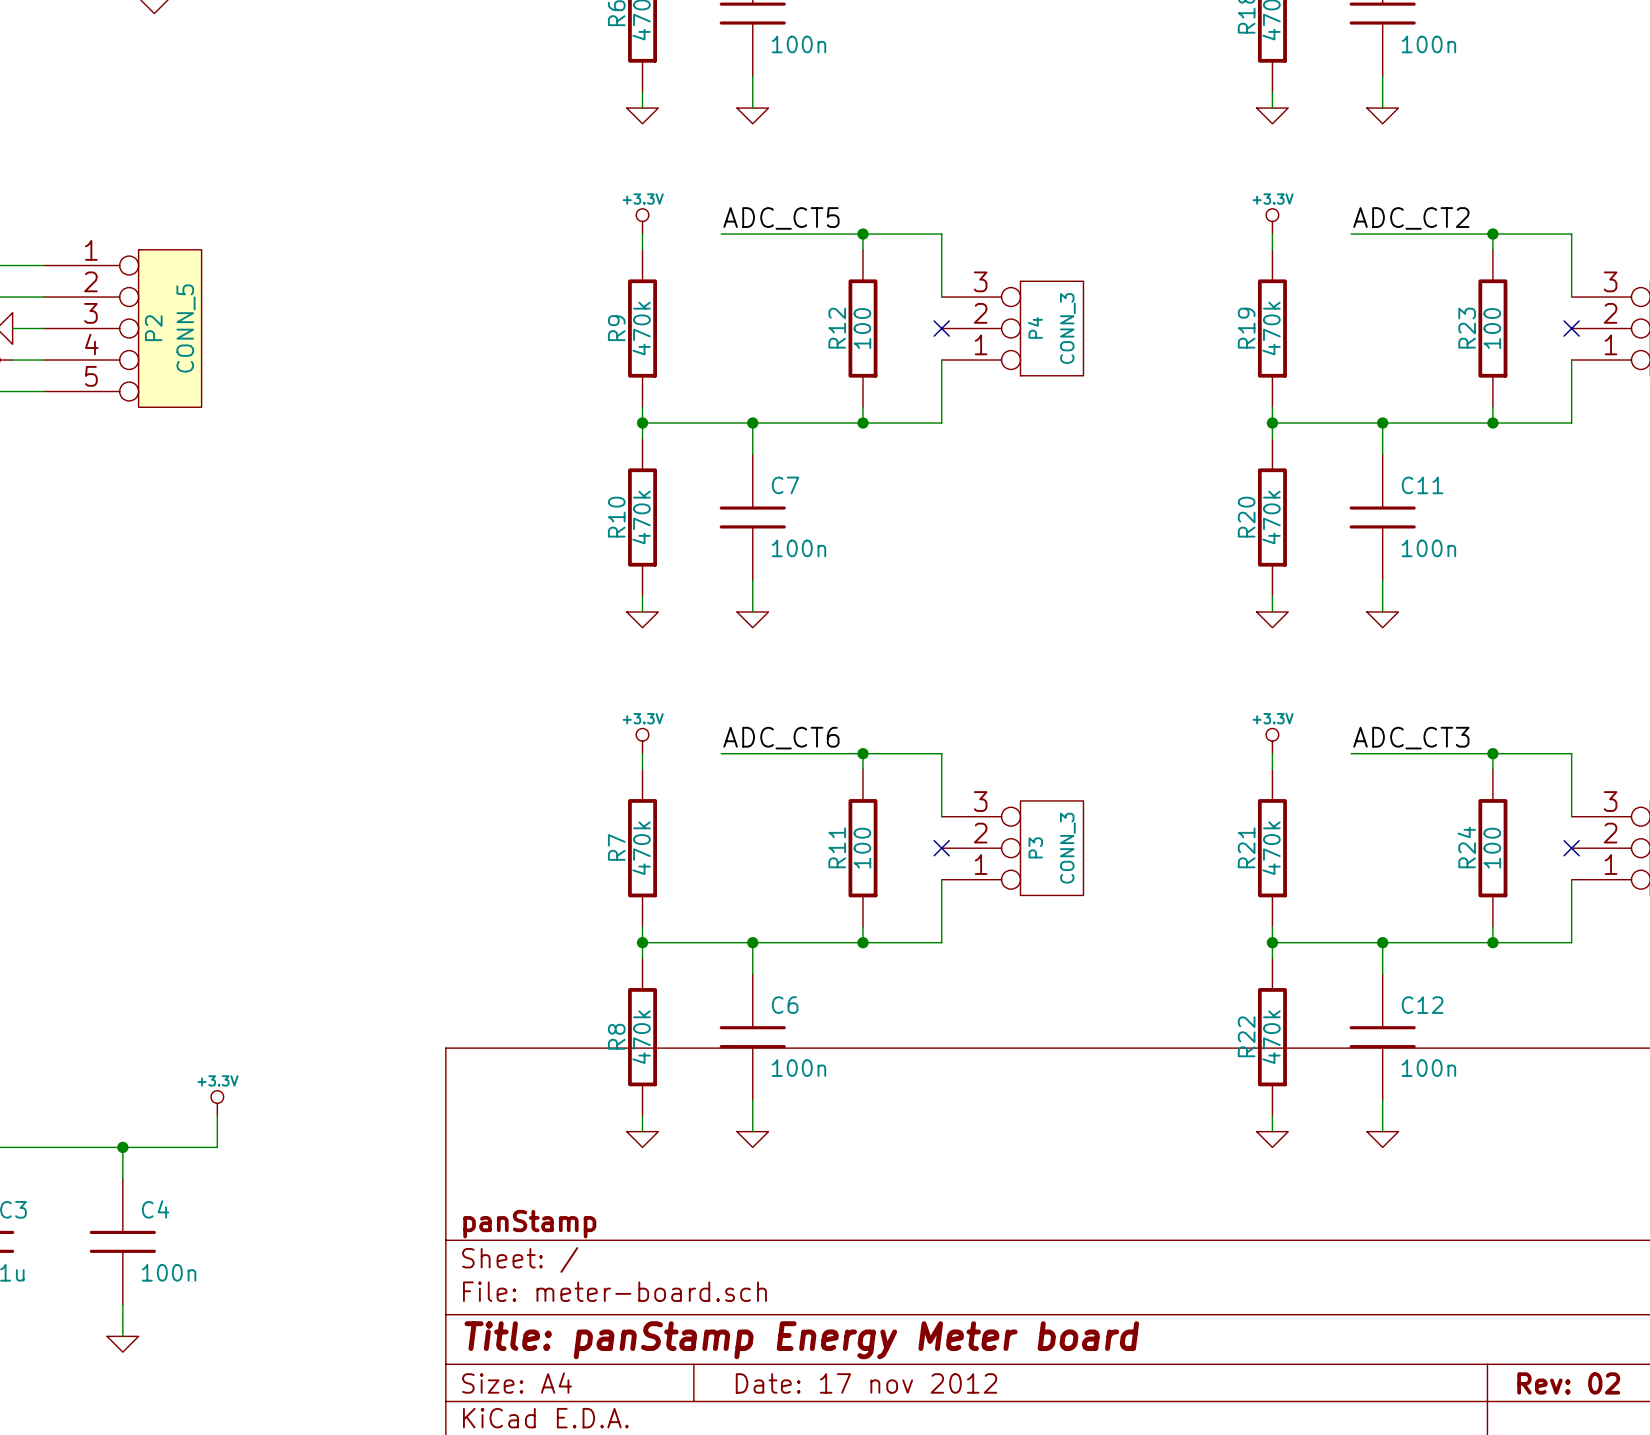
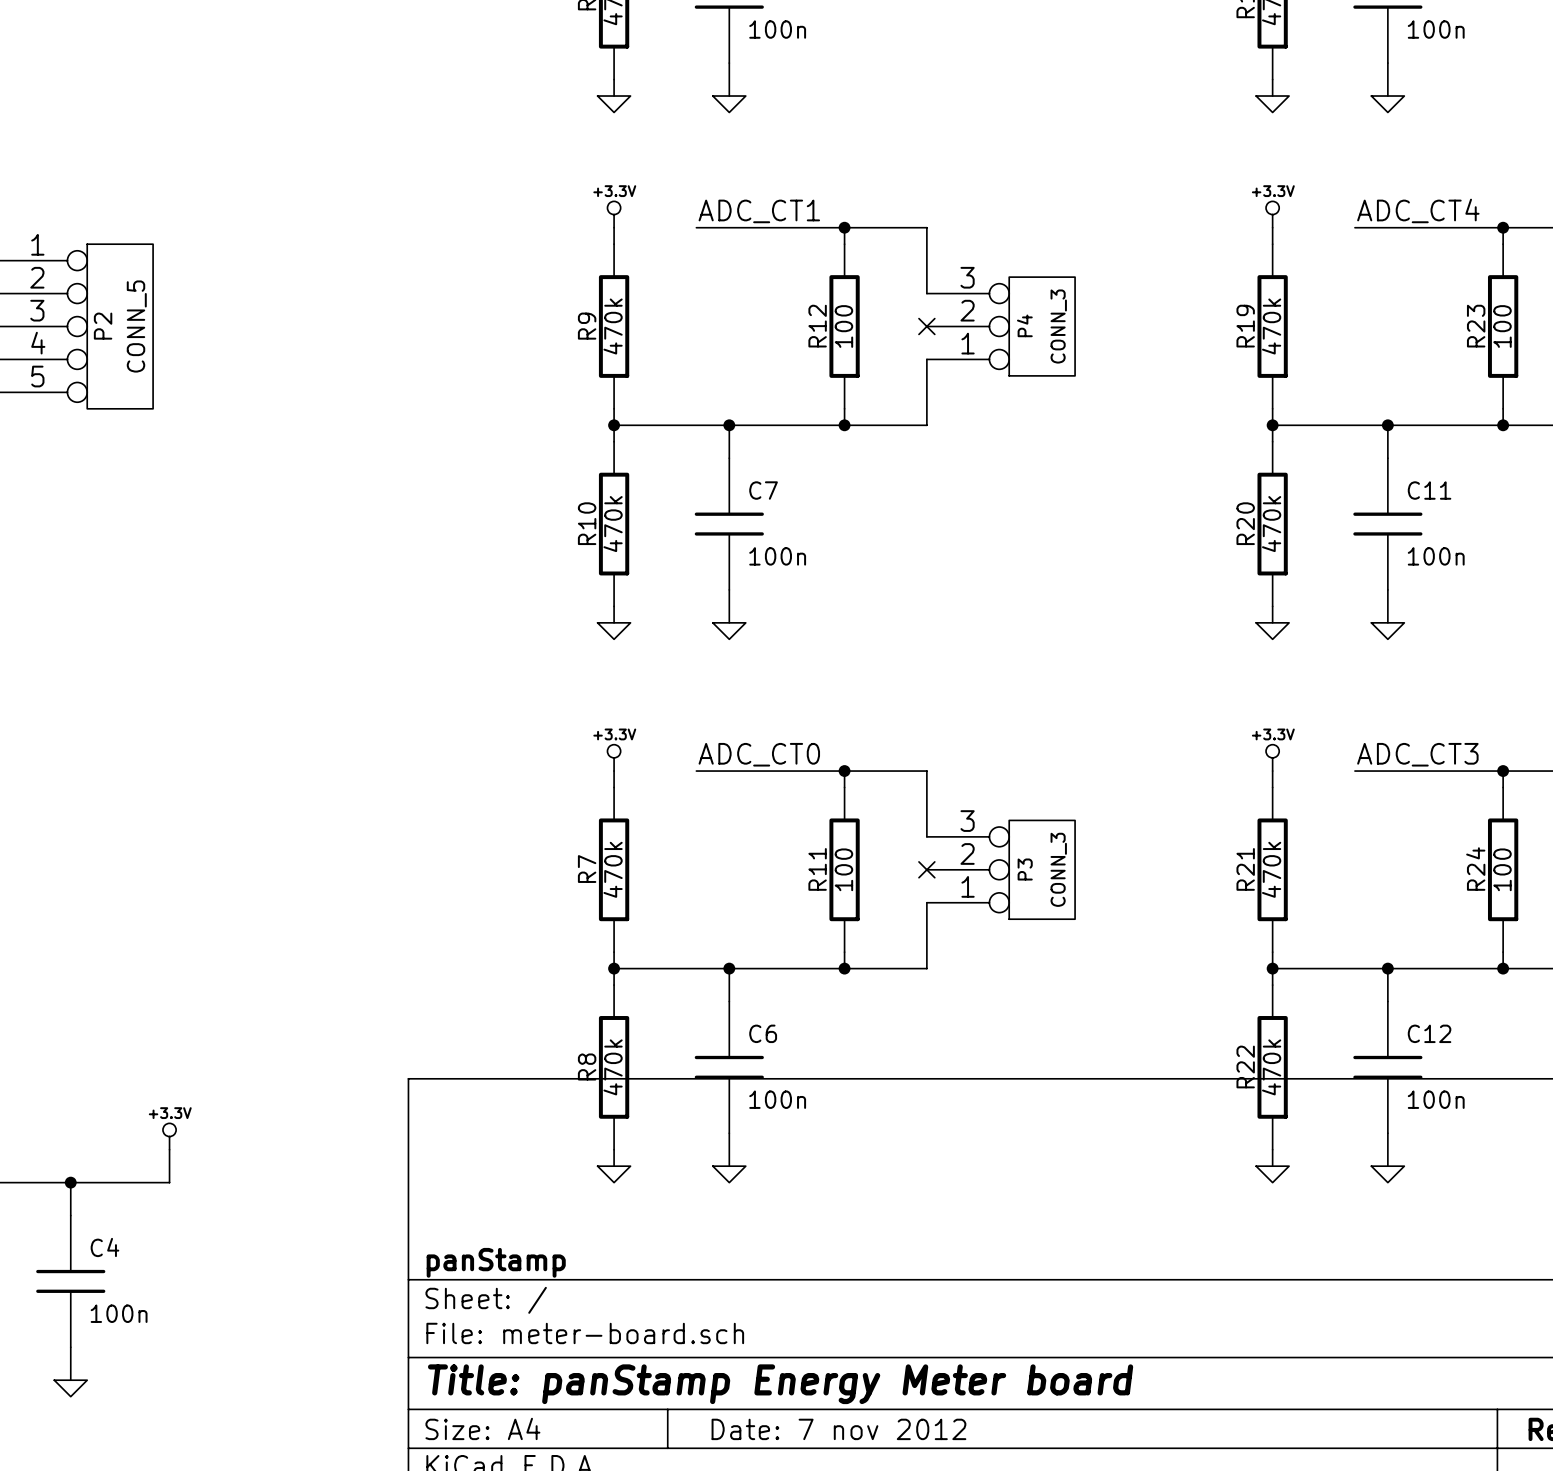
label: ADC_CT5 (781, 218) -> ADC_CT1 (759, 211)
label: ADC_CT2 (1411, 218) -> ADC_CT4 (1418, 210)
label: ADC_CT6 (781, 738) -> ADC_CT0 (759, 754)
title block: Date: 17 nov 2012 (866, 1383) -> Date: 7 nov 2012 (838, 1429)

